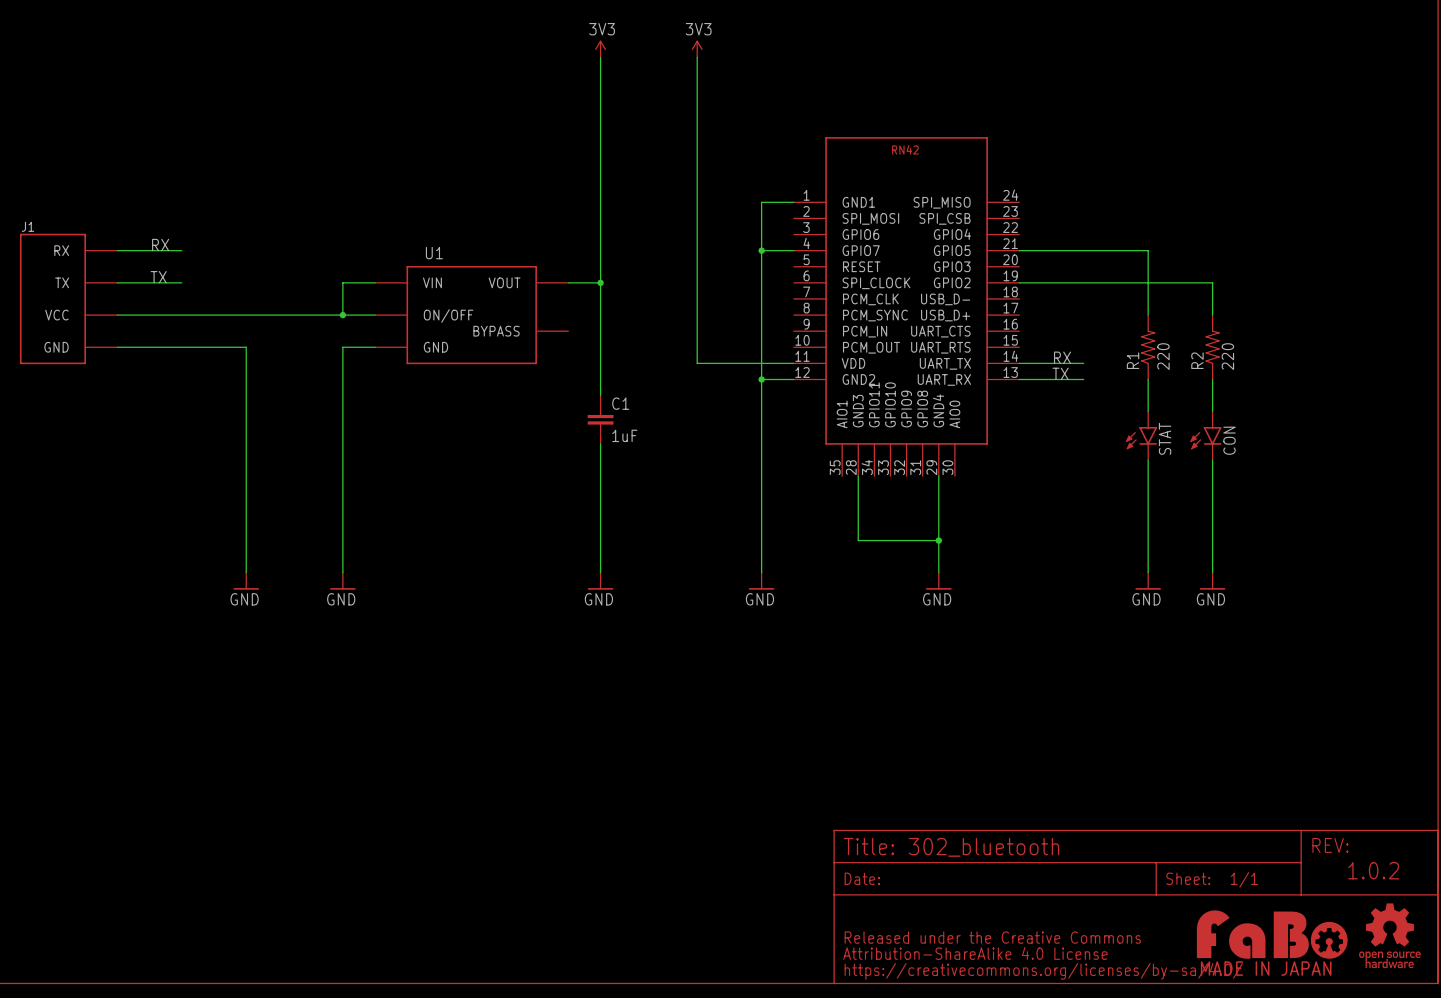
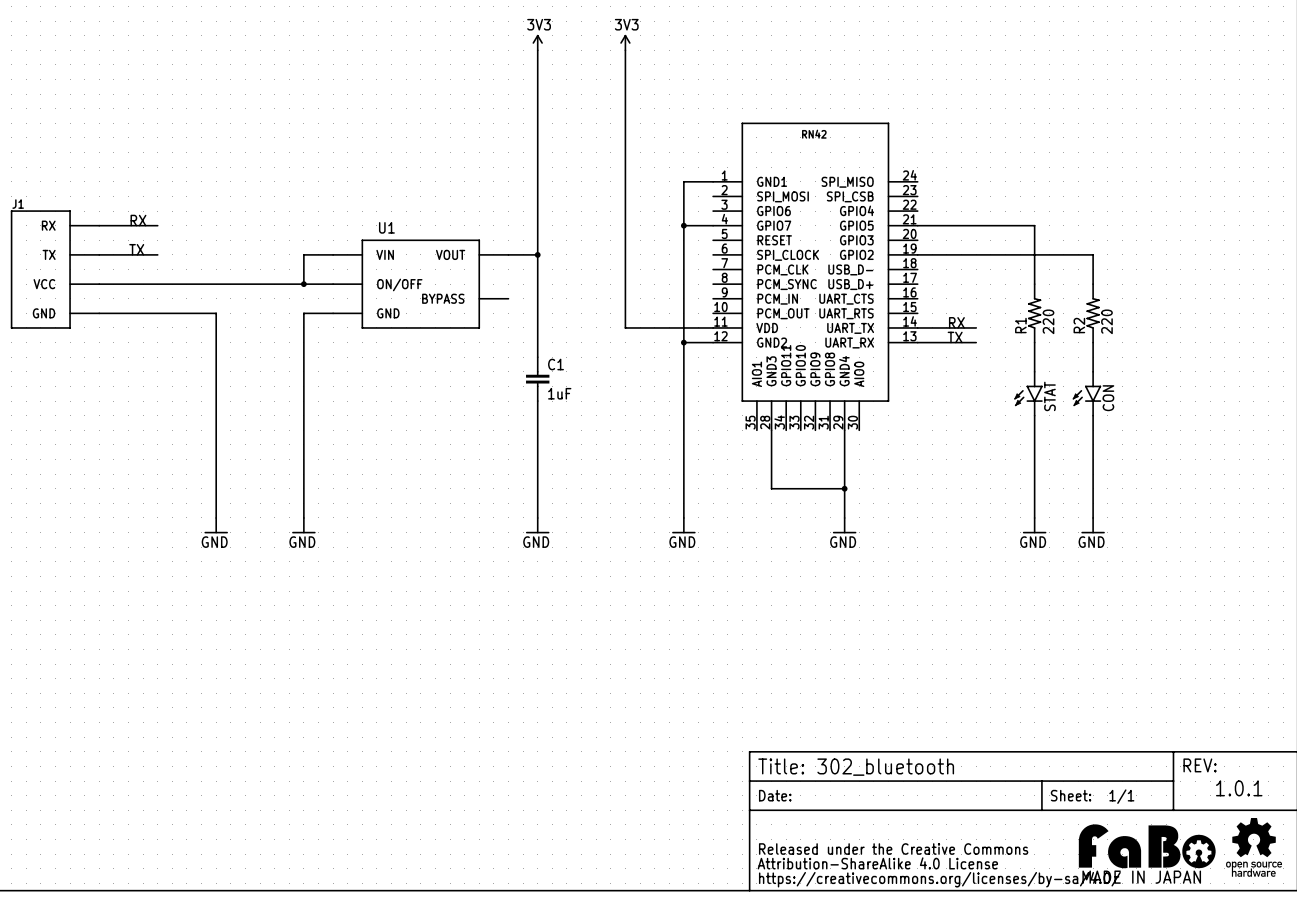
text: 1.0.2 (1373, 870) -> 1.0.1 (1239, 788)

